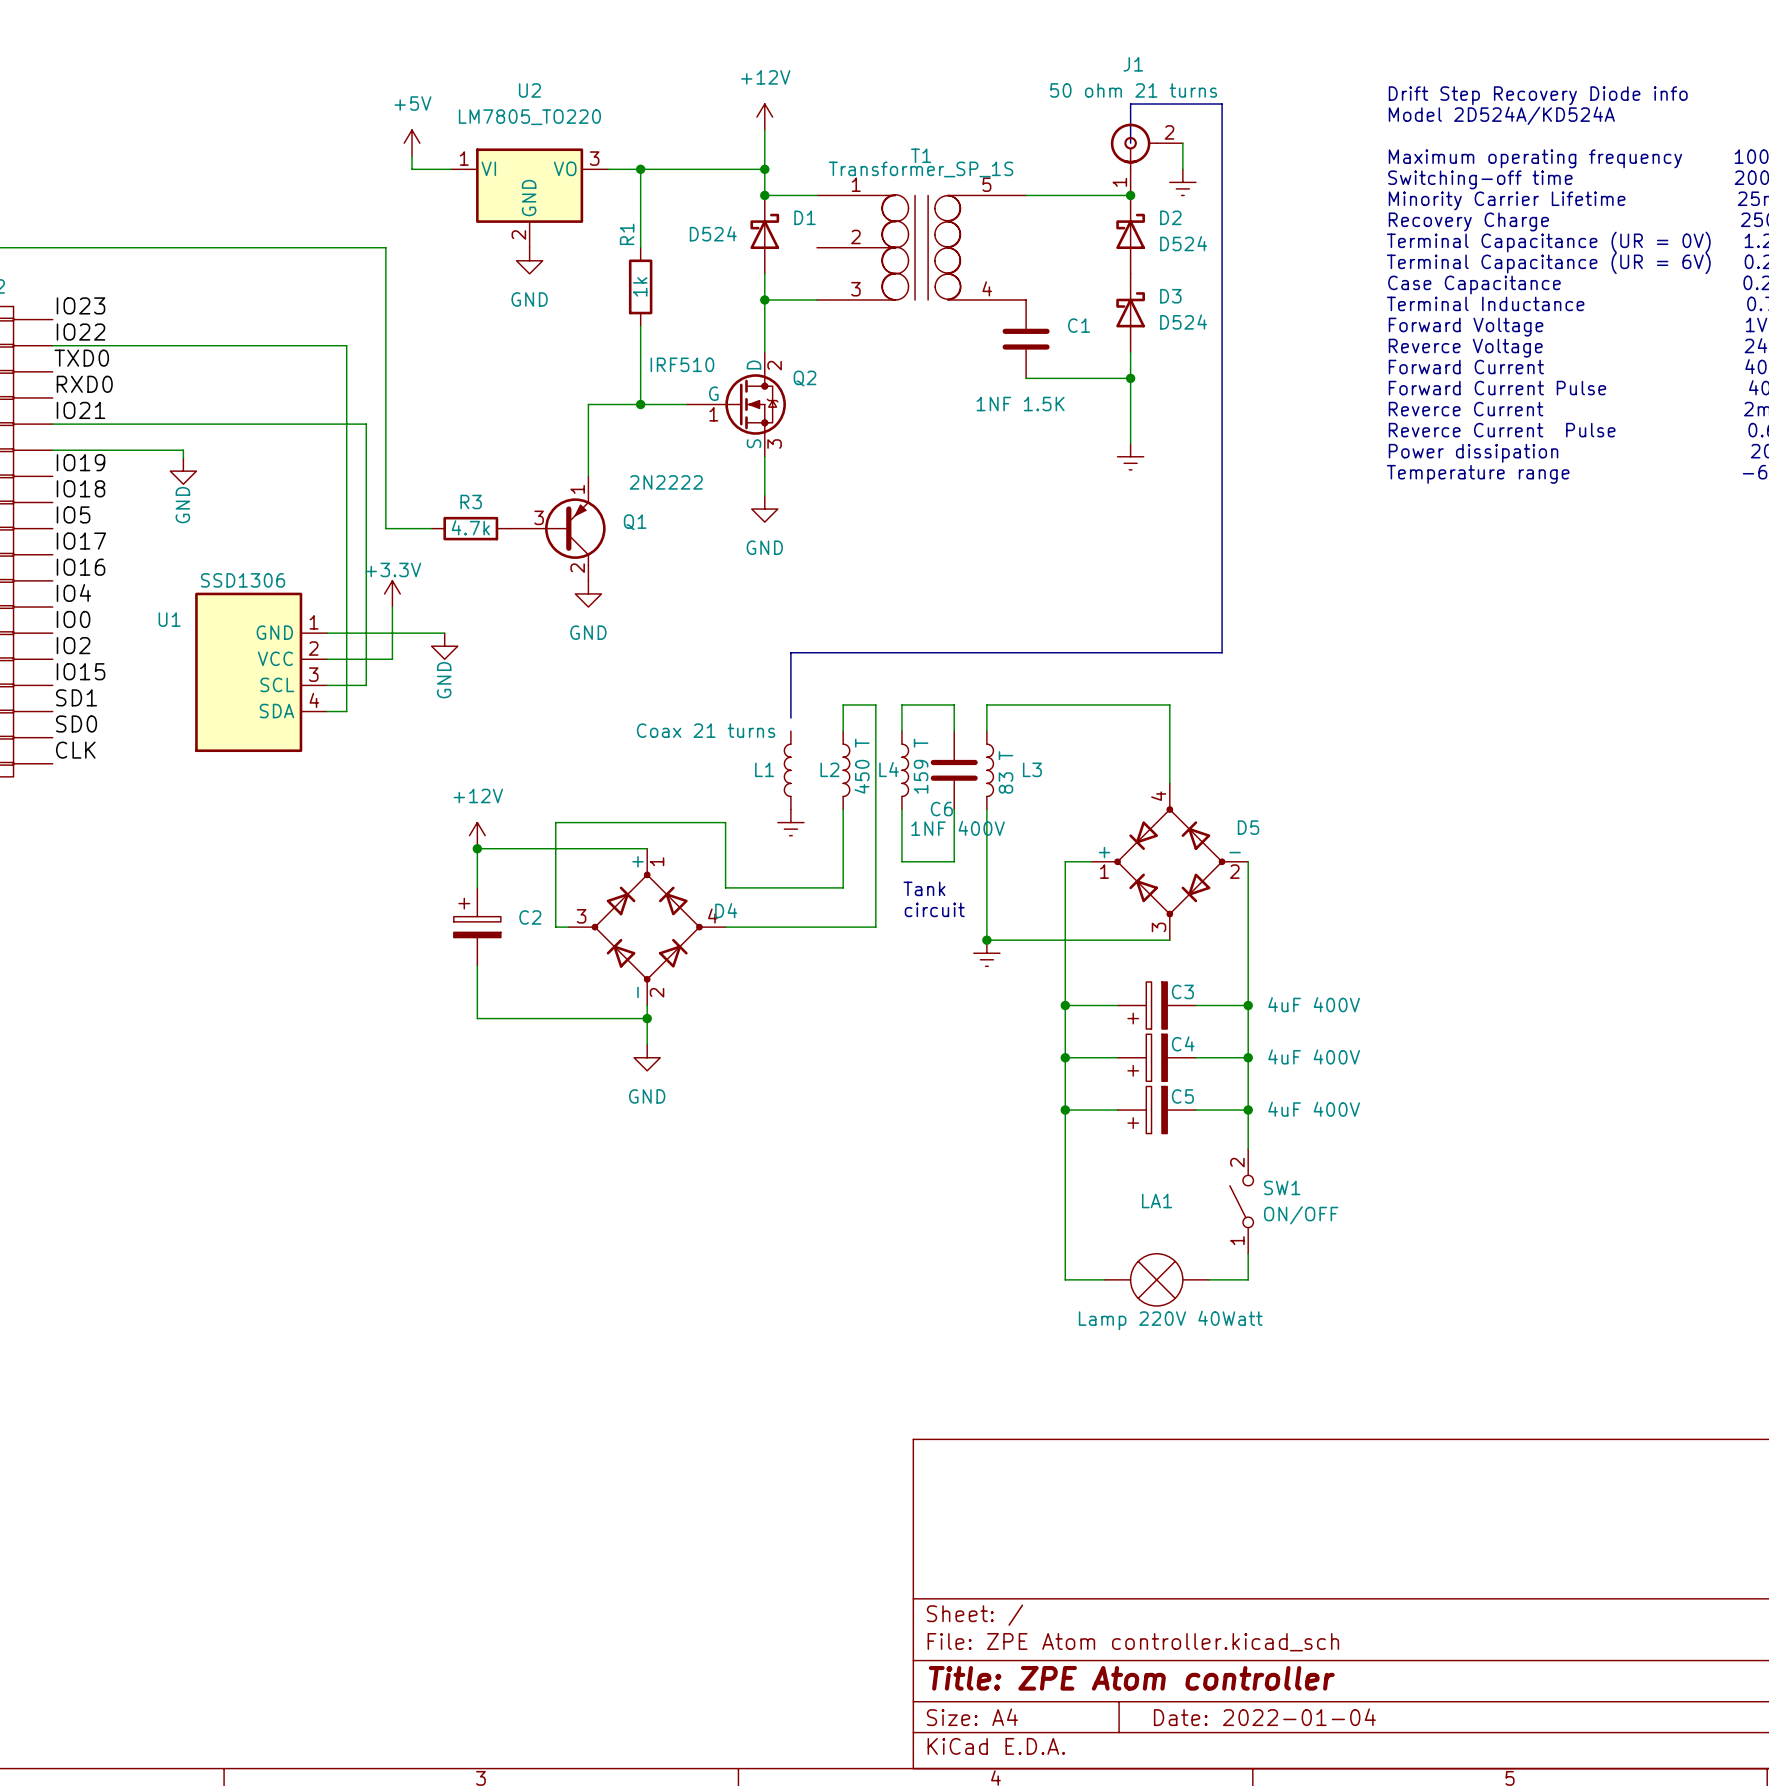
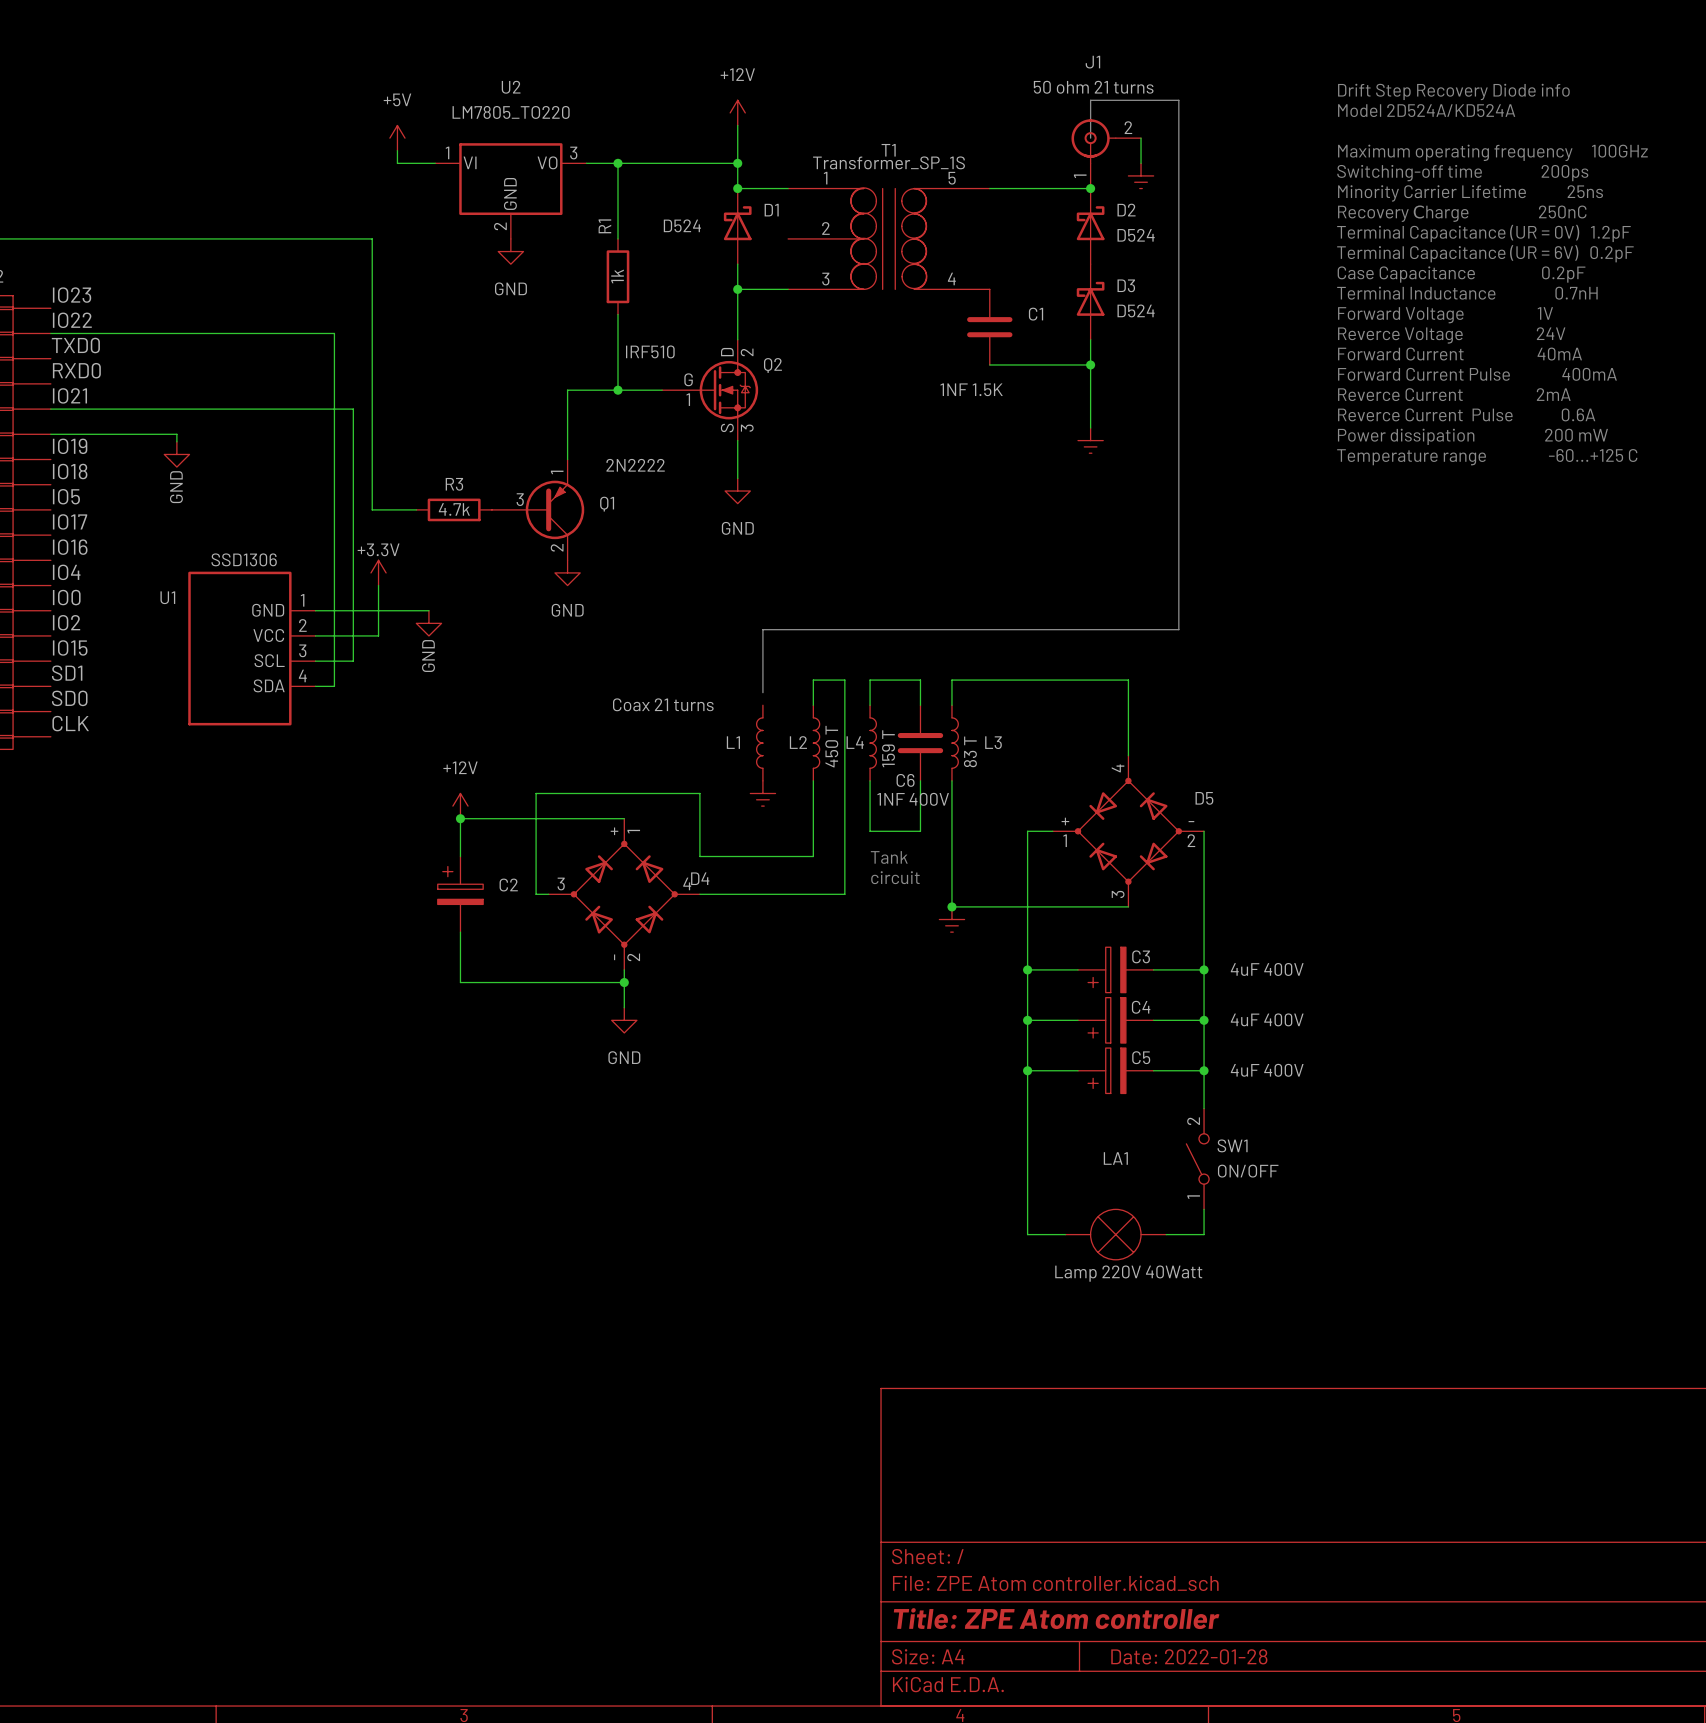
title block: Date: 2022-01-04 (1264, 1717) -> Date: 2022-01-28 (1189, 1656)

